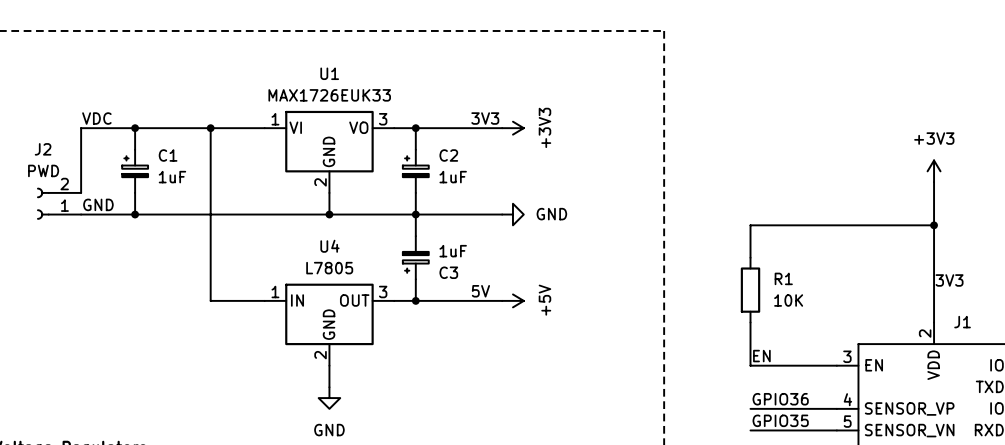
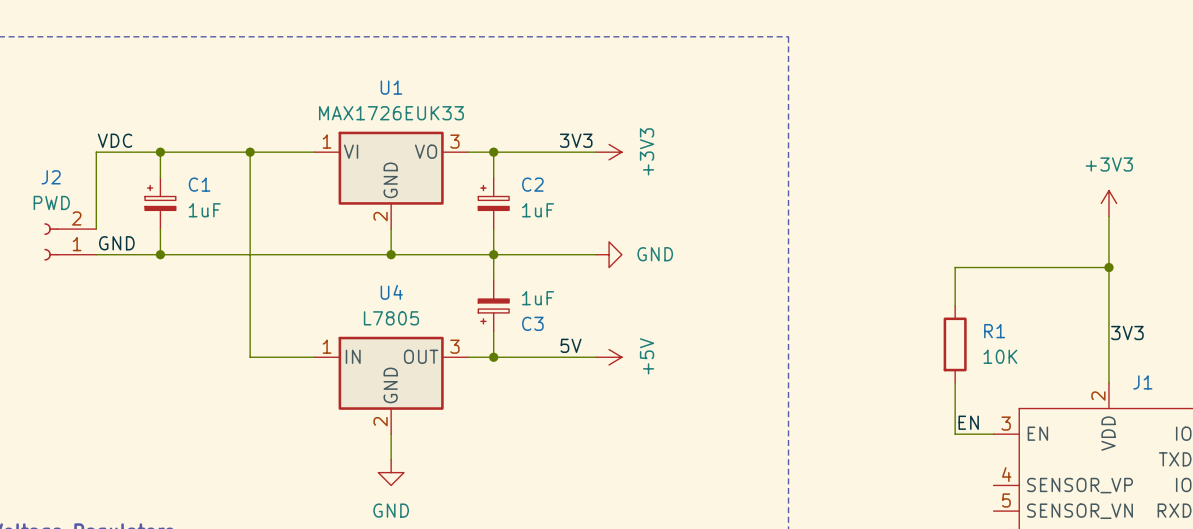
wire: (804, 225) (750, 225) (750, 257) -> (955, 267) (955, 305)
R1 position: (750, 290) -> (955, 344)
wire: (750, 322) (750, 365) (804, 365) -> (955, 382) (955, 434)
label position: EN (761, 356) -> EN (968, 422)
label: GPIO36 (780, 399) -> none
wire: (750, 408) (836, 408) -> none
label: GPIO35 (780, 420) -> none
wire: (750, 430) (836, 430) -> none

